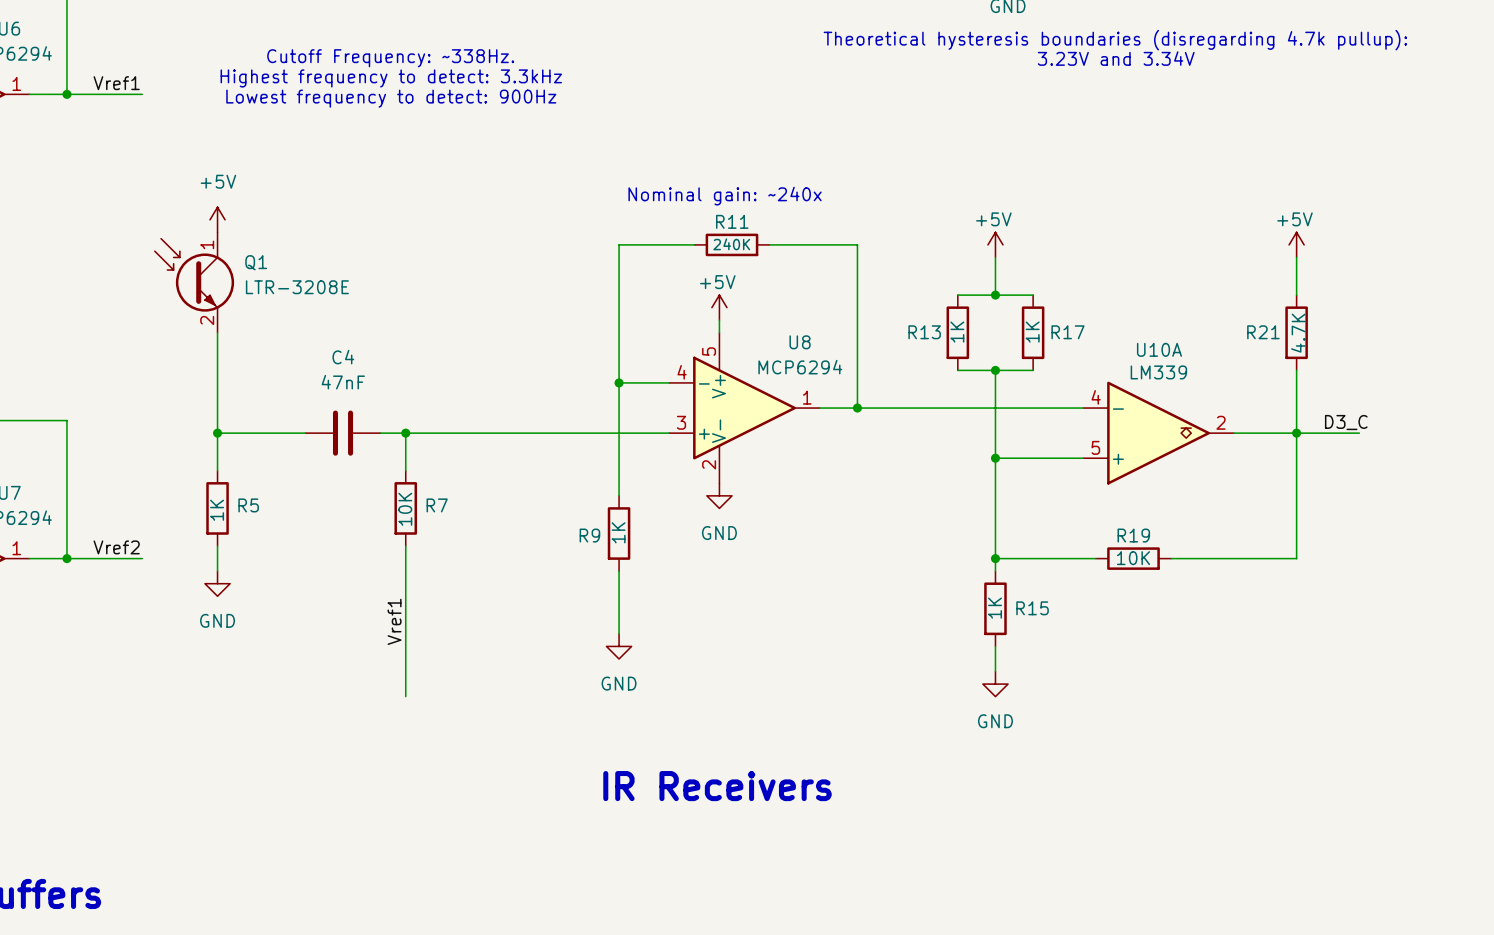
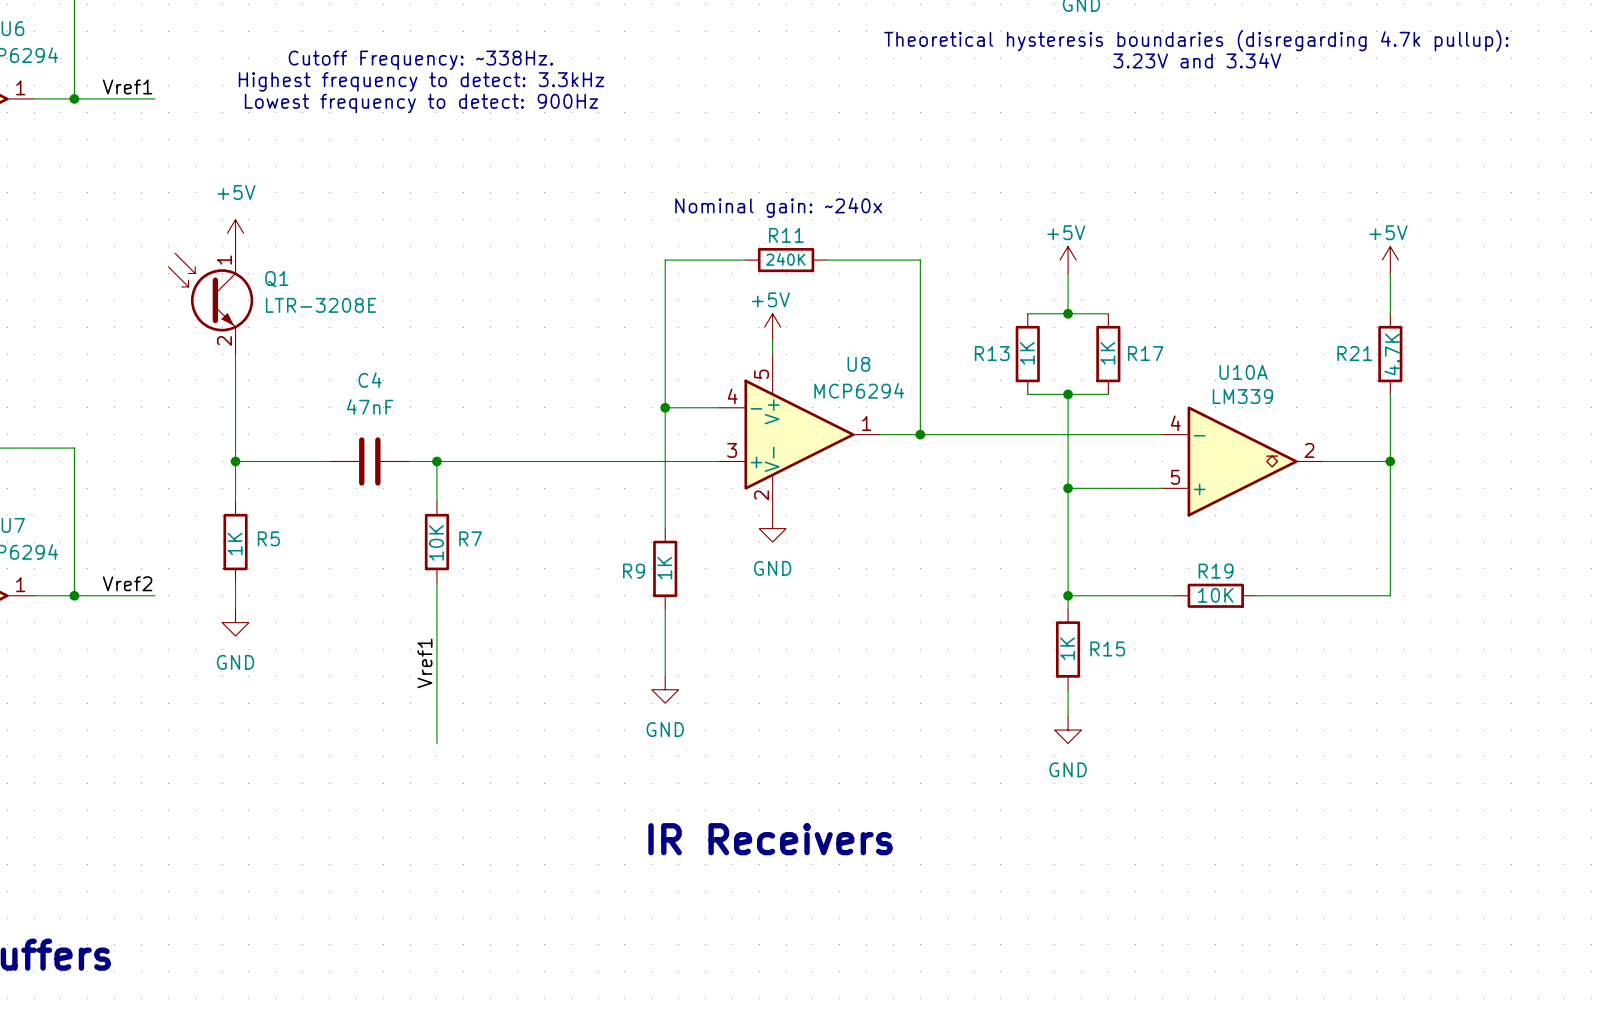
label: D3_C (1346, 422) -> none
wire: (1296, 433) (1359, 433) -> none

